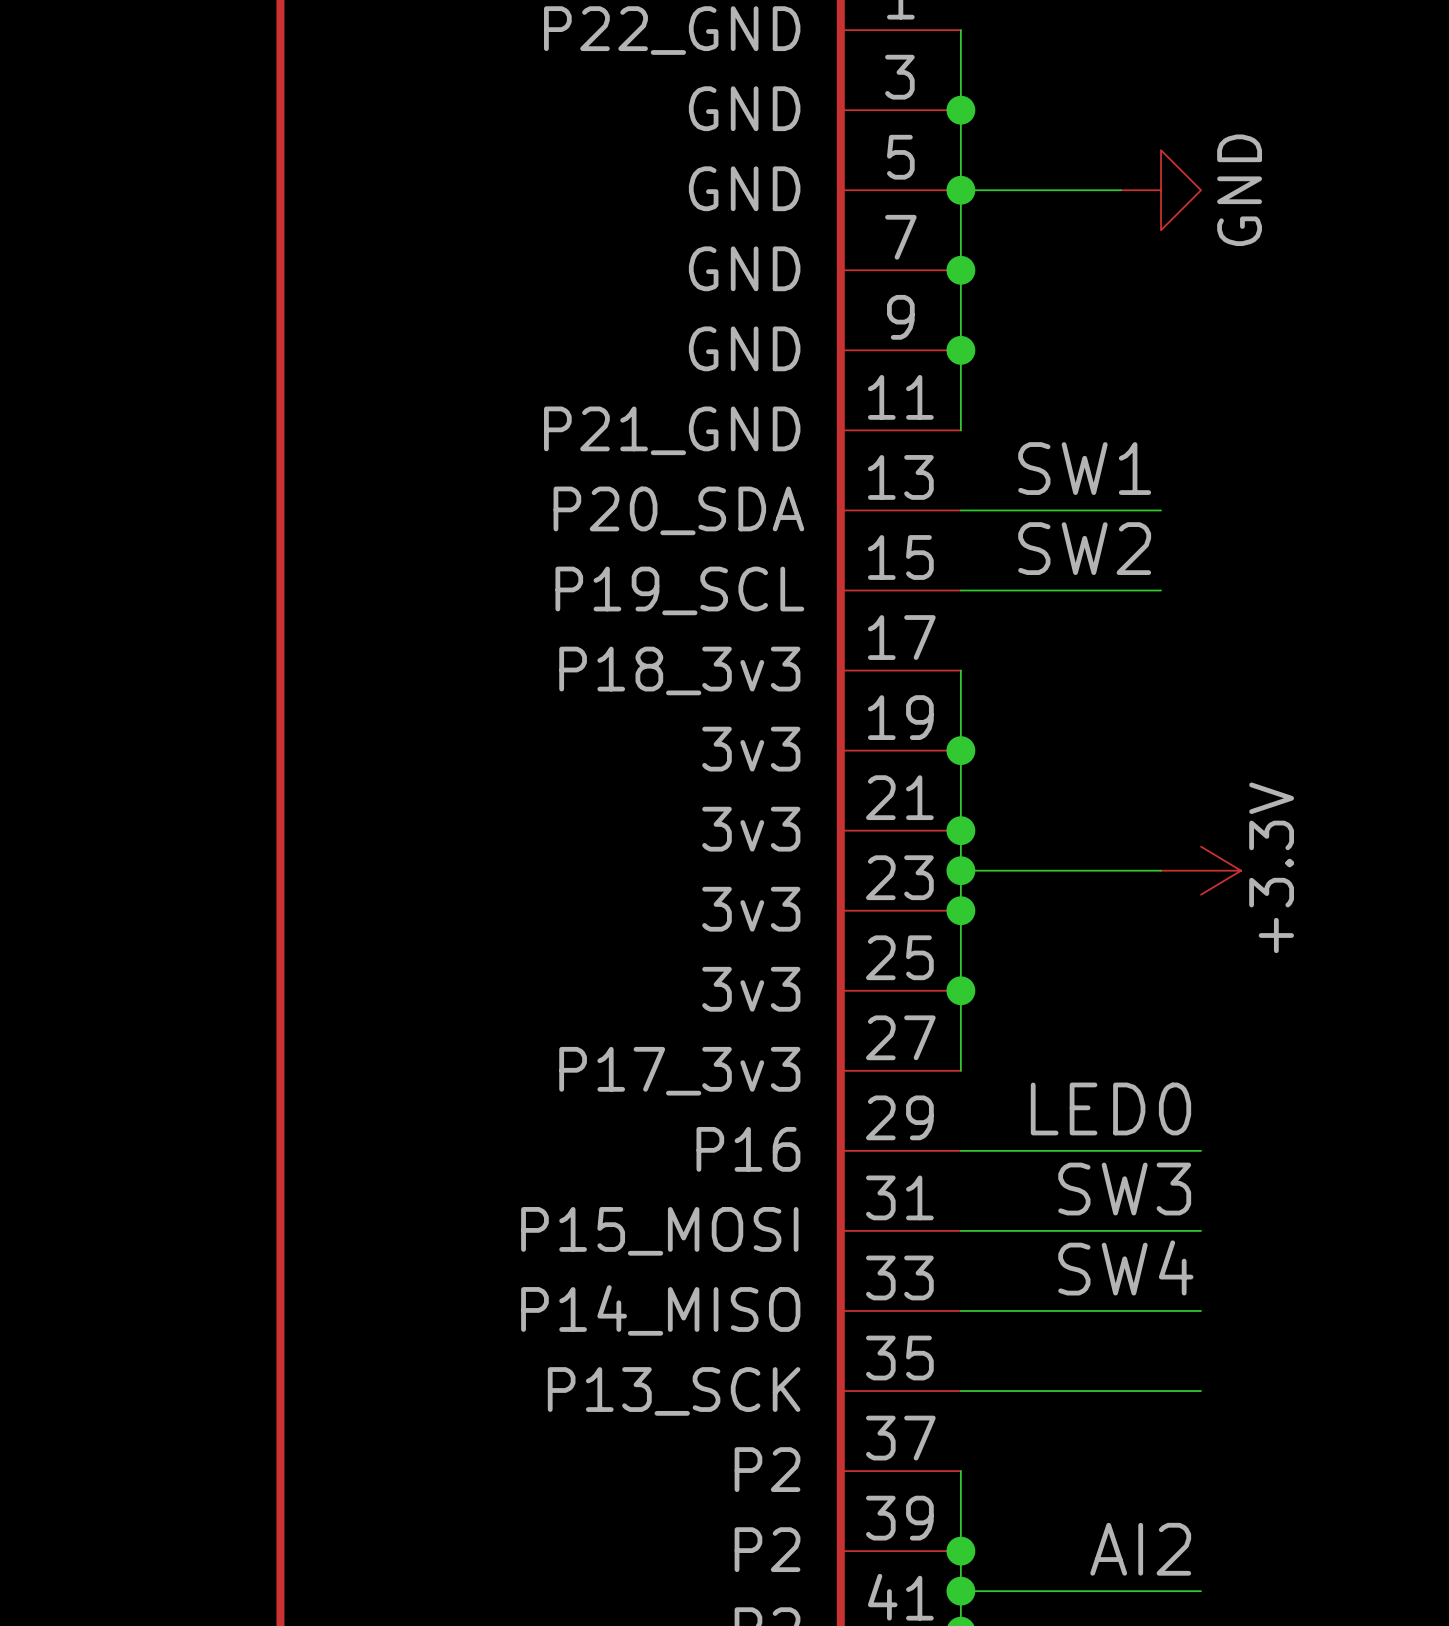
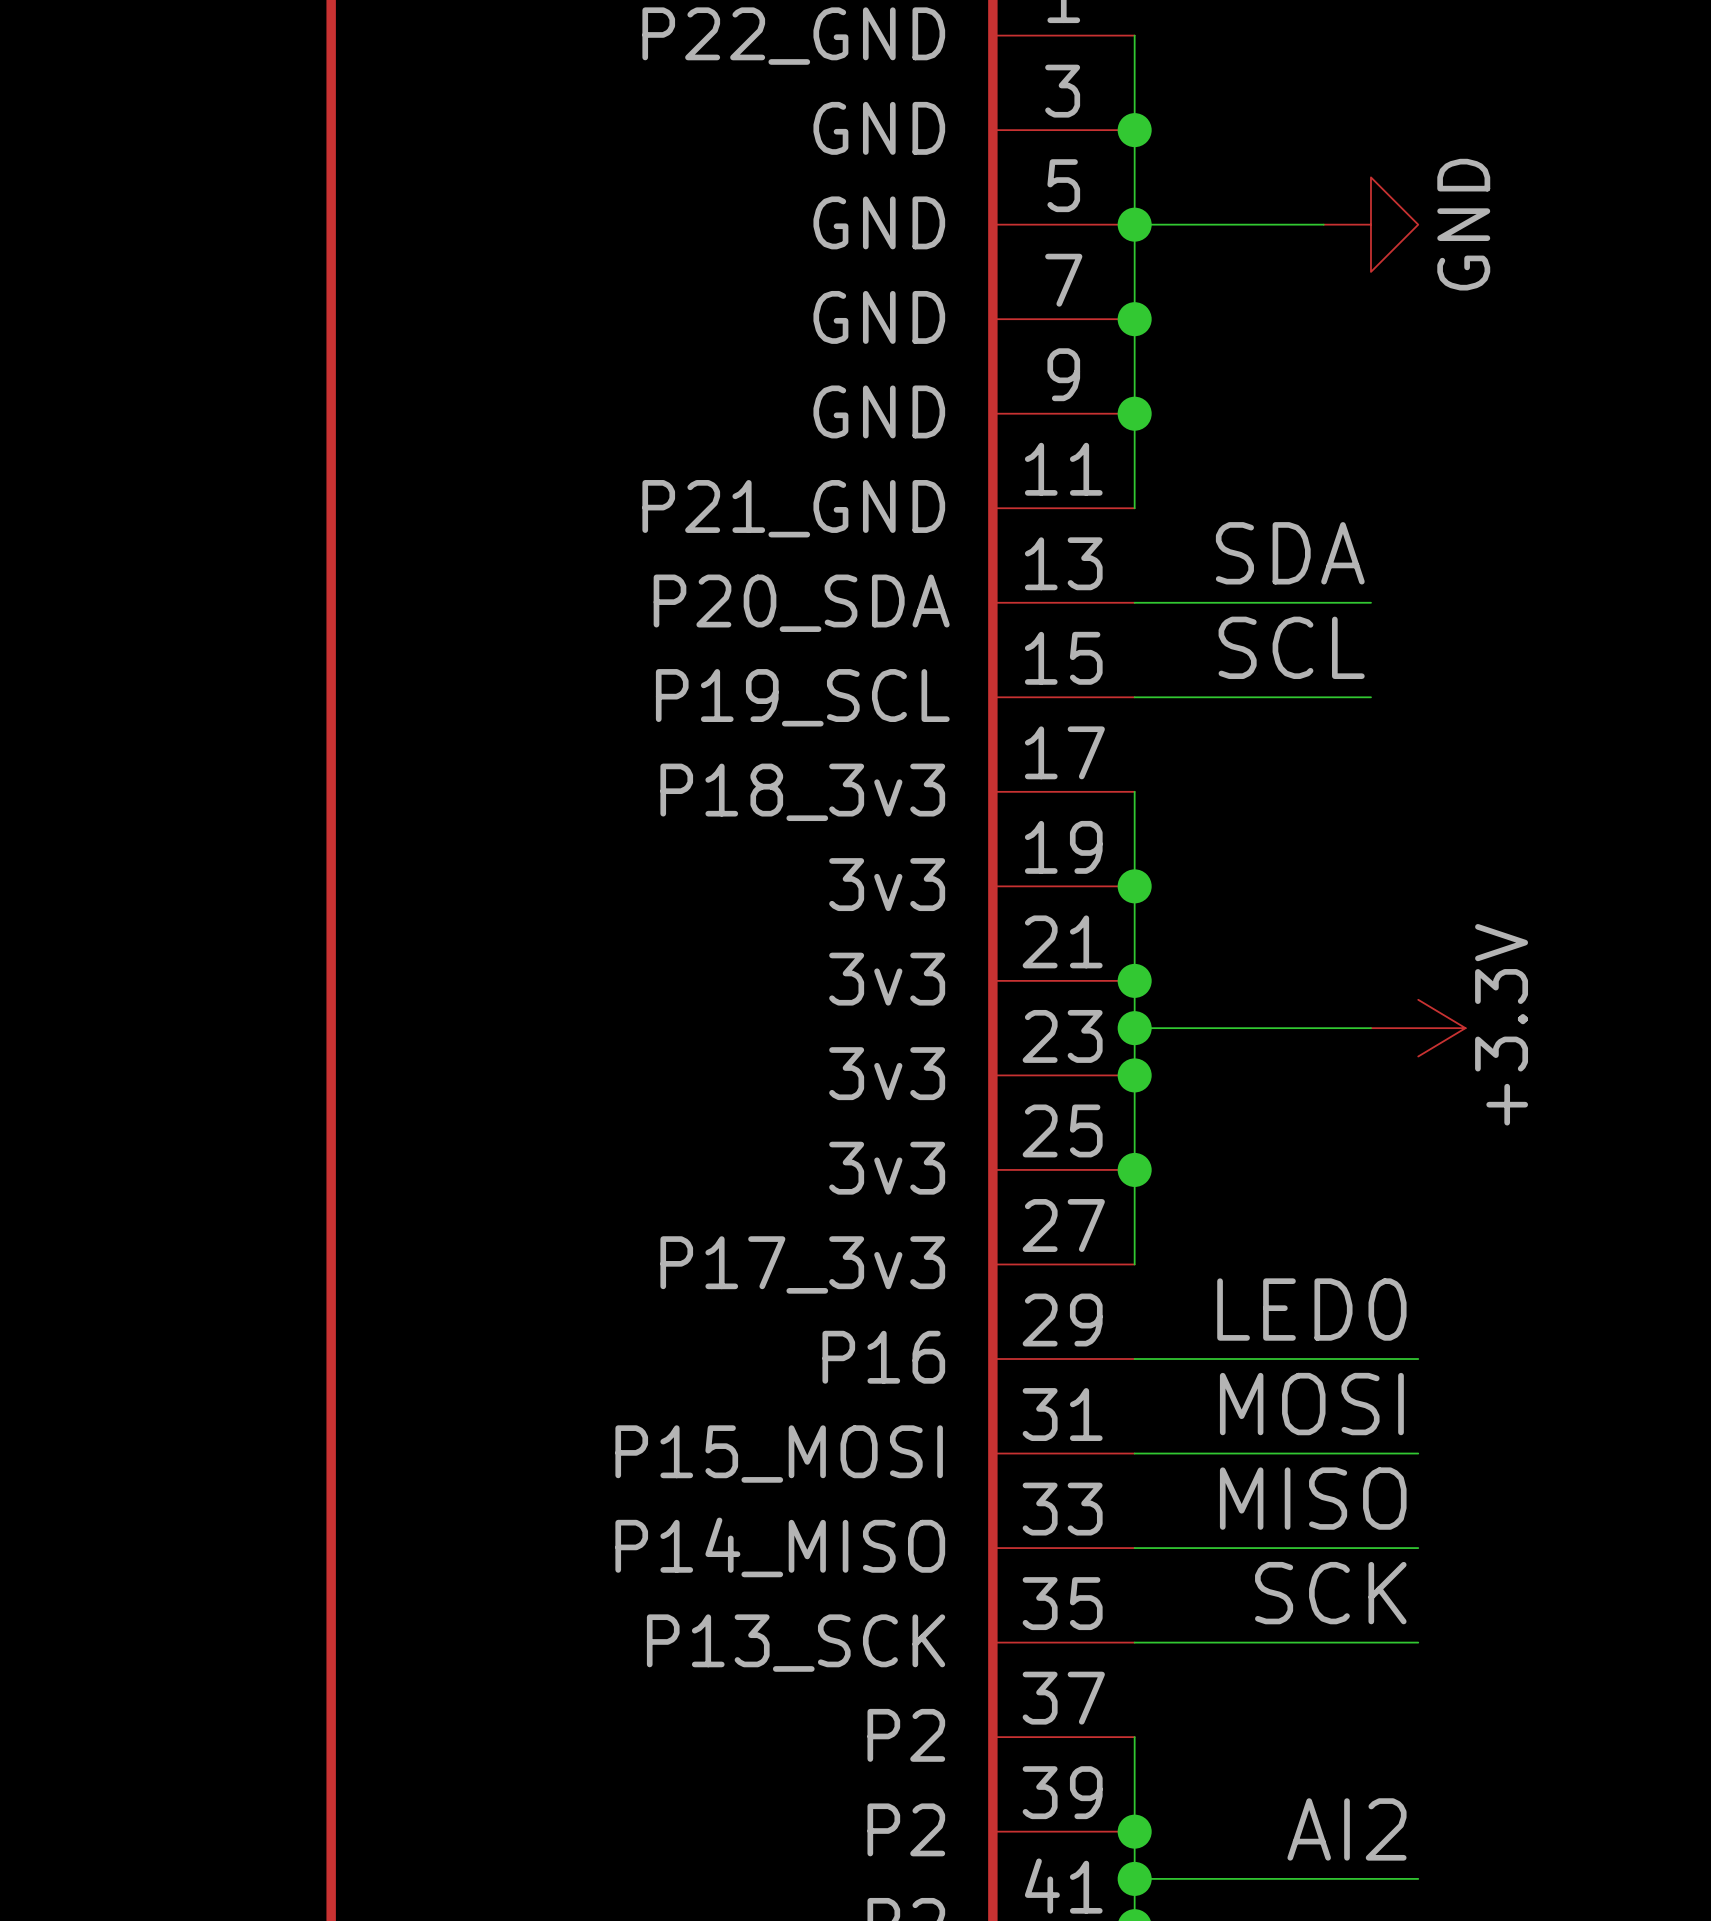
label: SW1 (1084, 468) -> SDA (1290, 553)
label: SW2 (1084, 548) -> SCL (1291, 647)
label: SW3 (1124, 1189) -> MOSI (1311, 1404)
label: SW4 (1125, 1267) -> MISO (1313, 1498)
label: none -> SCK (1330, 1593)

